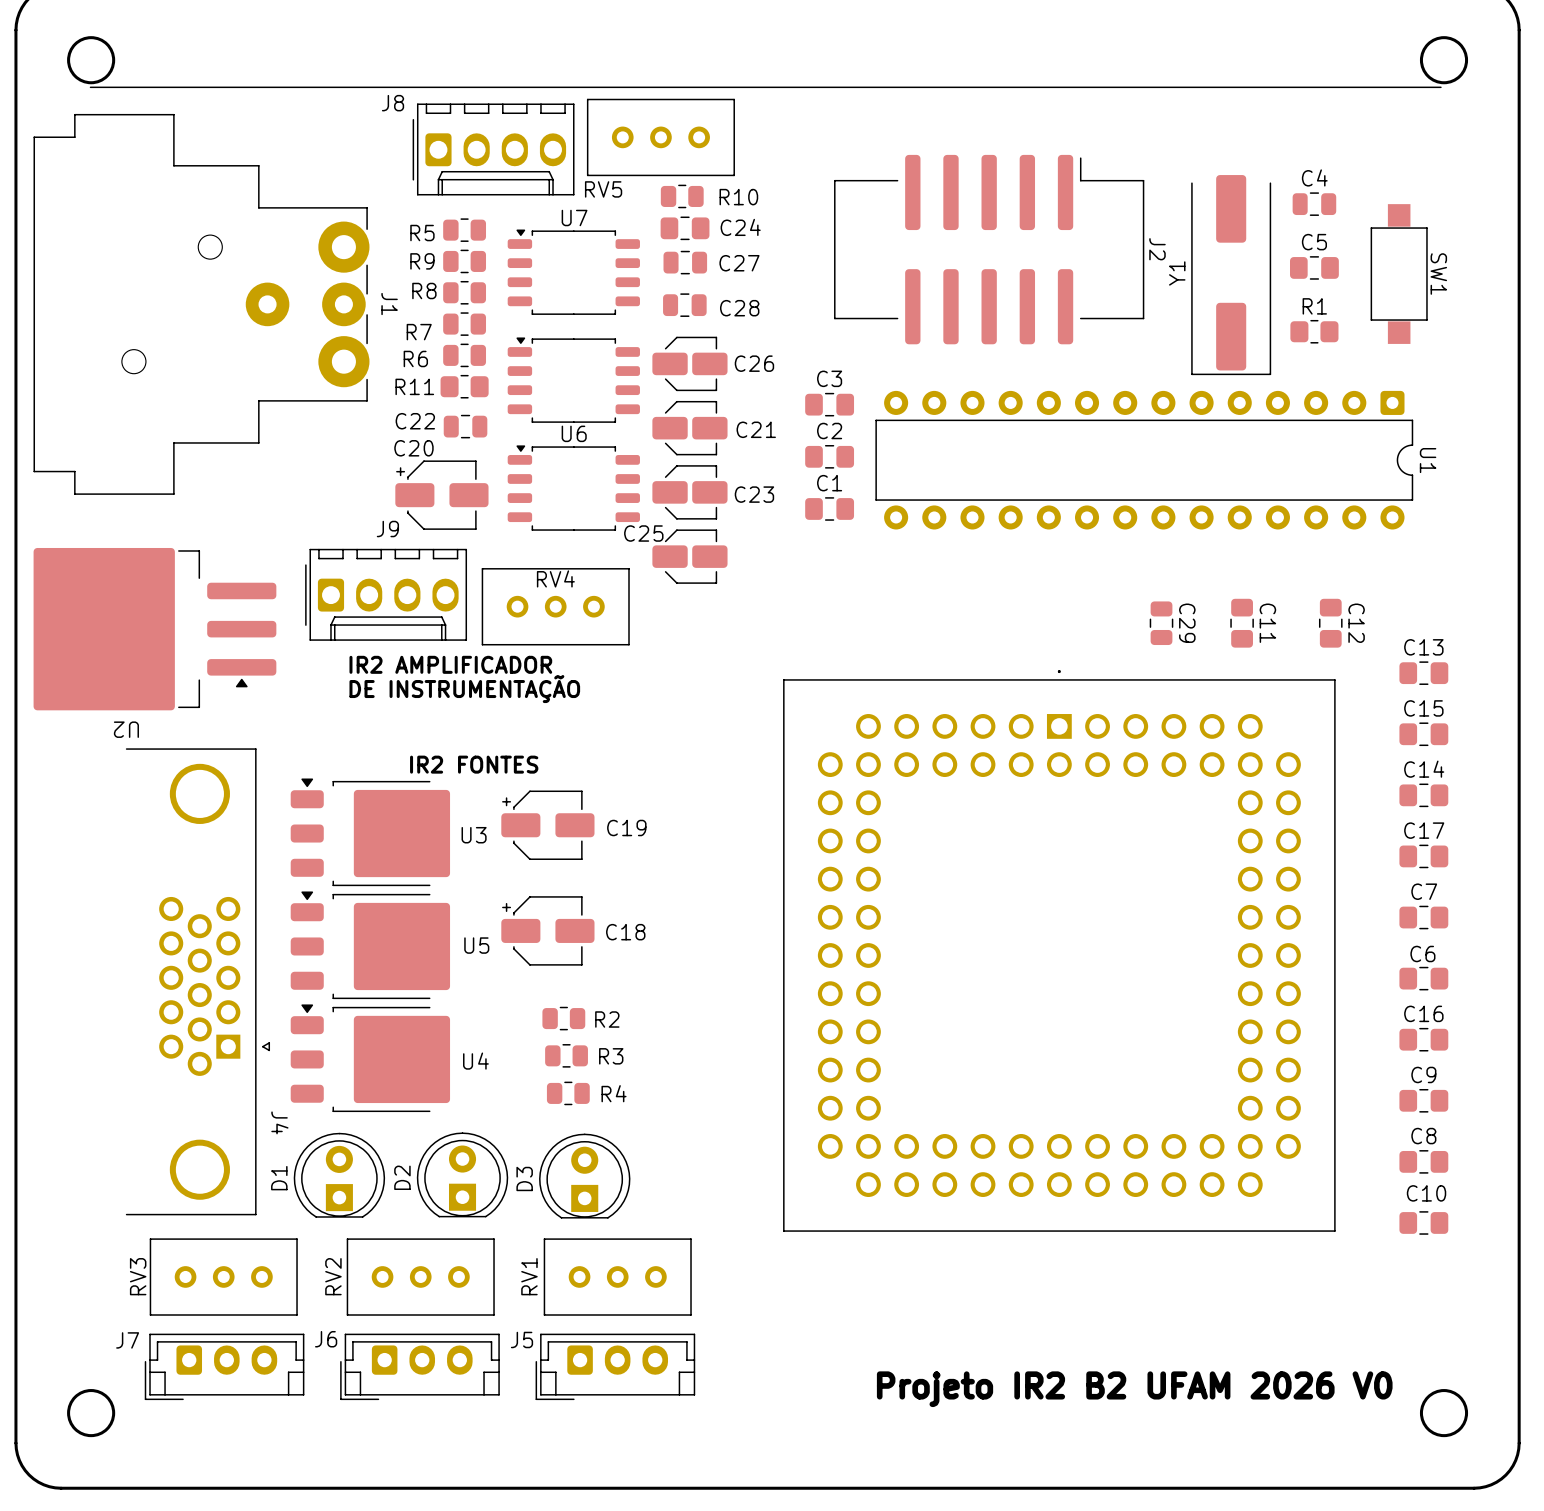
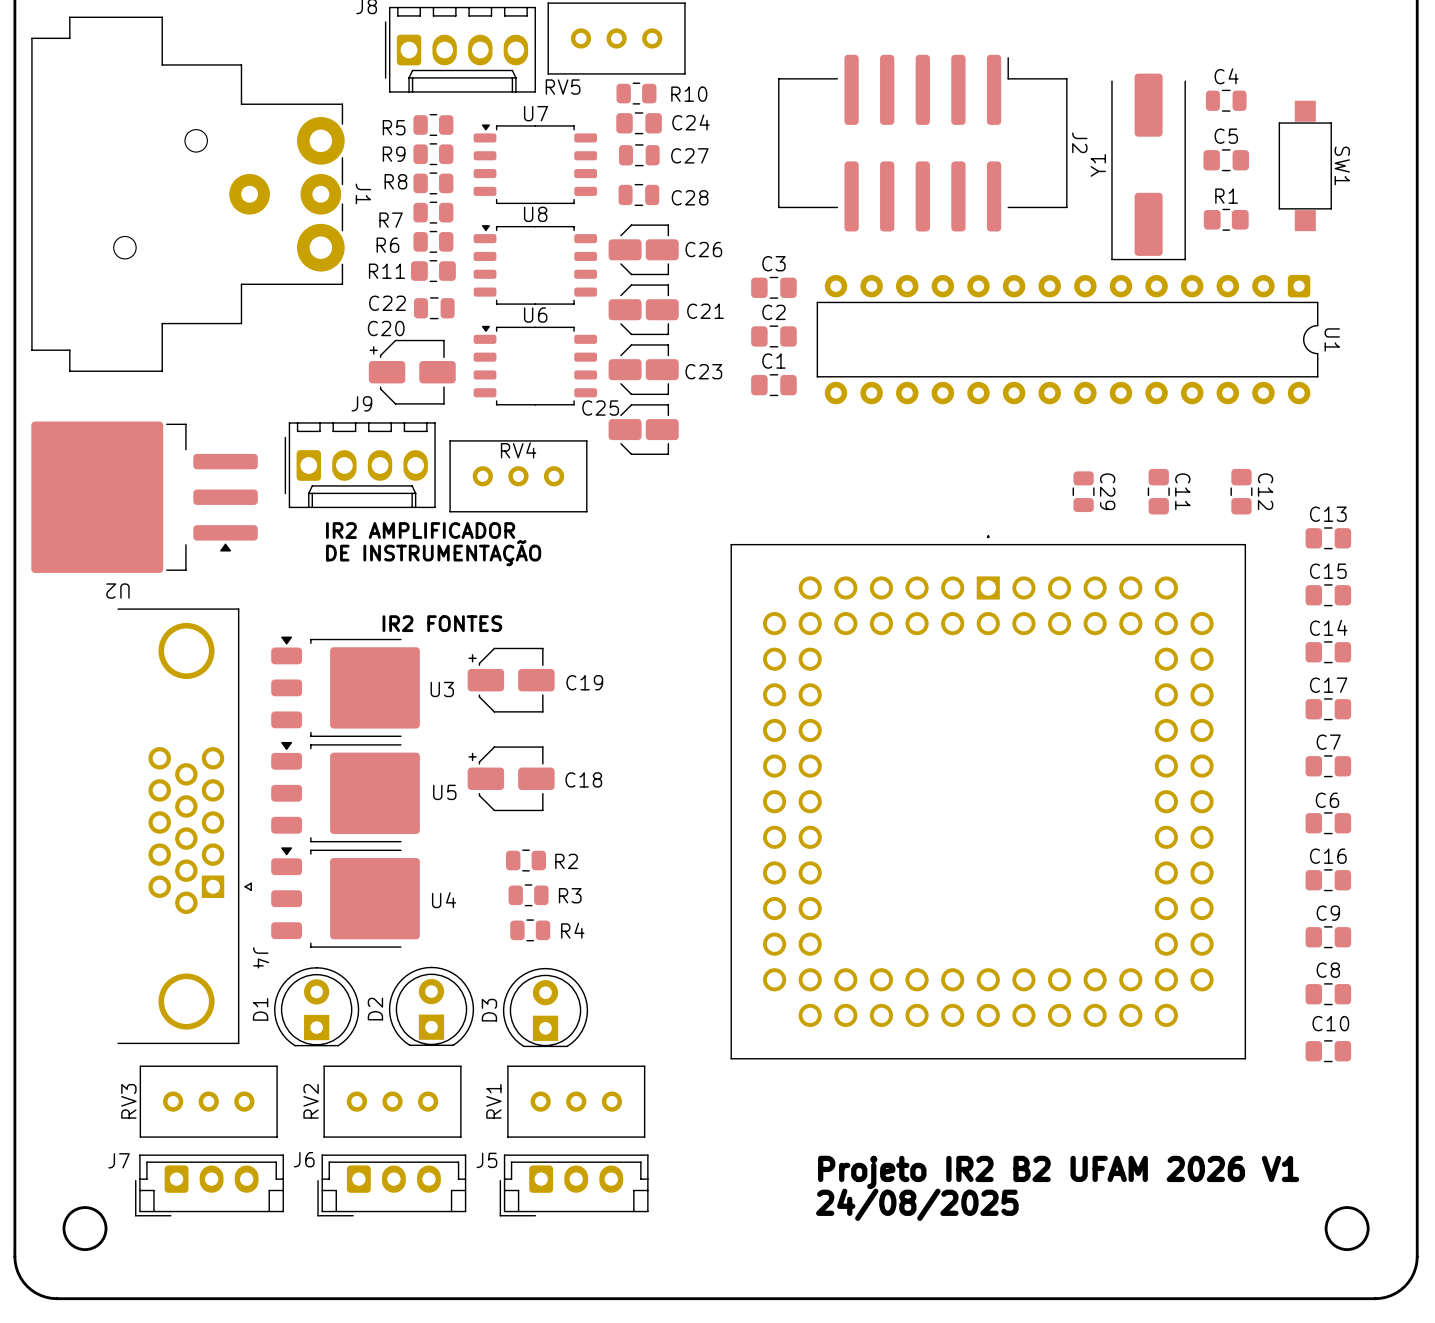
U8 name: none -> U8 (535, 214)
text: none -> Projeto IR2 B2 UFAM 2026 V1 (1058, 1172)
text: Projeto IR2 B2 UFAM 2026 V0 (1134, 1389) -> 24/08/2025 (917, 1204)

